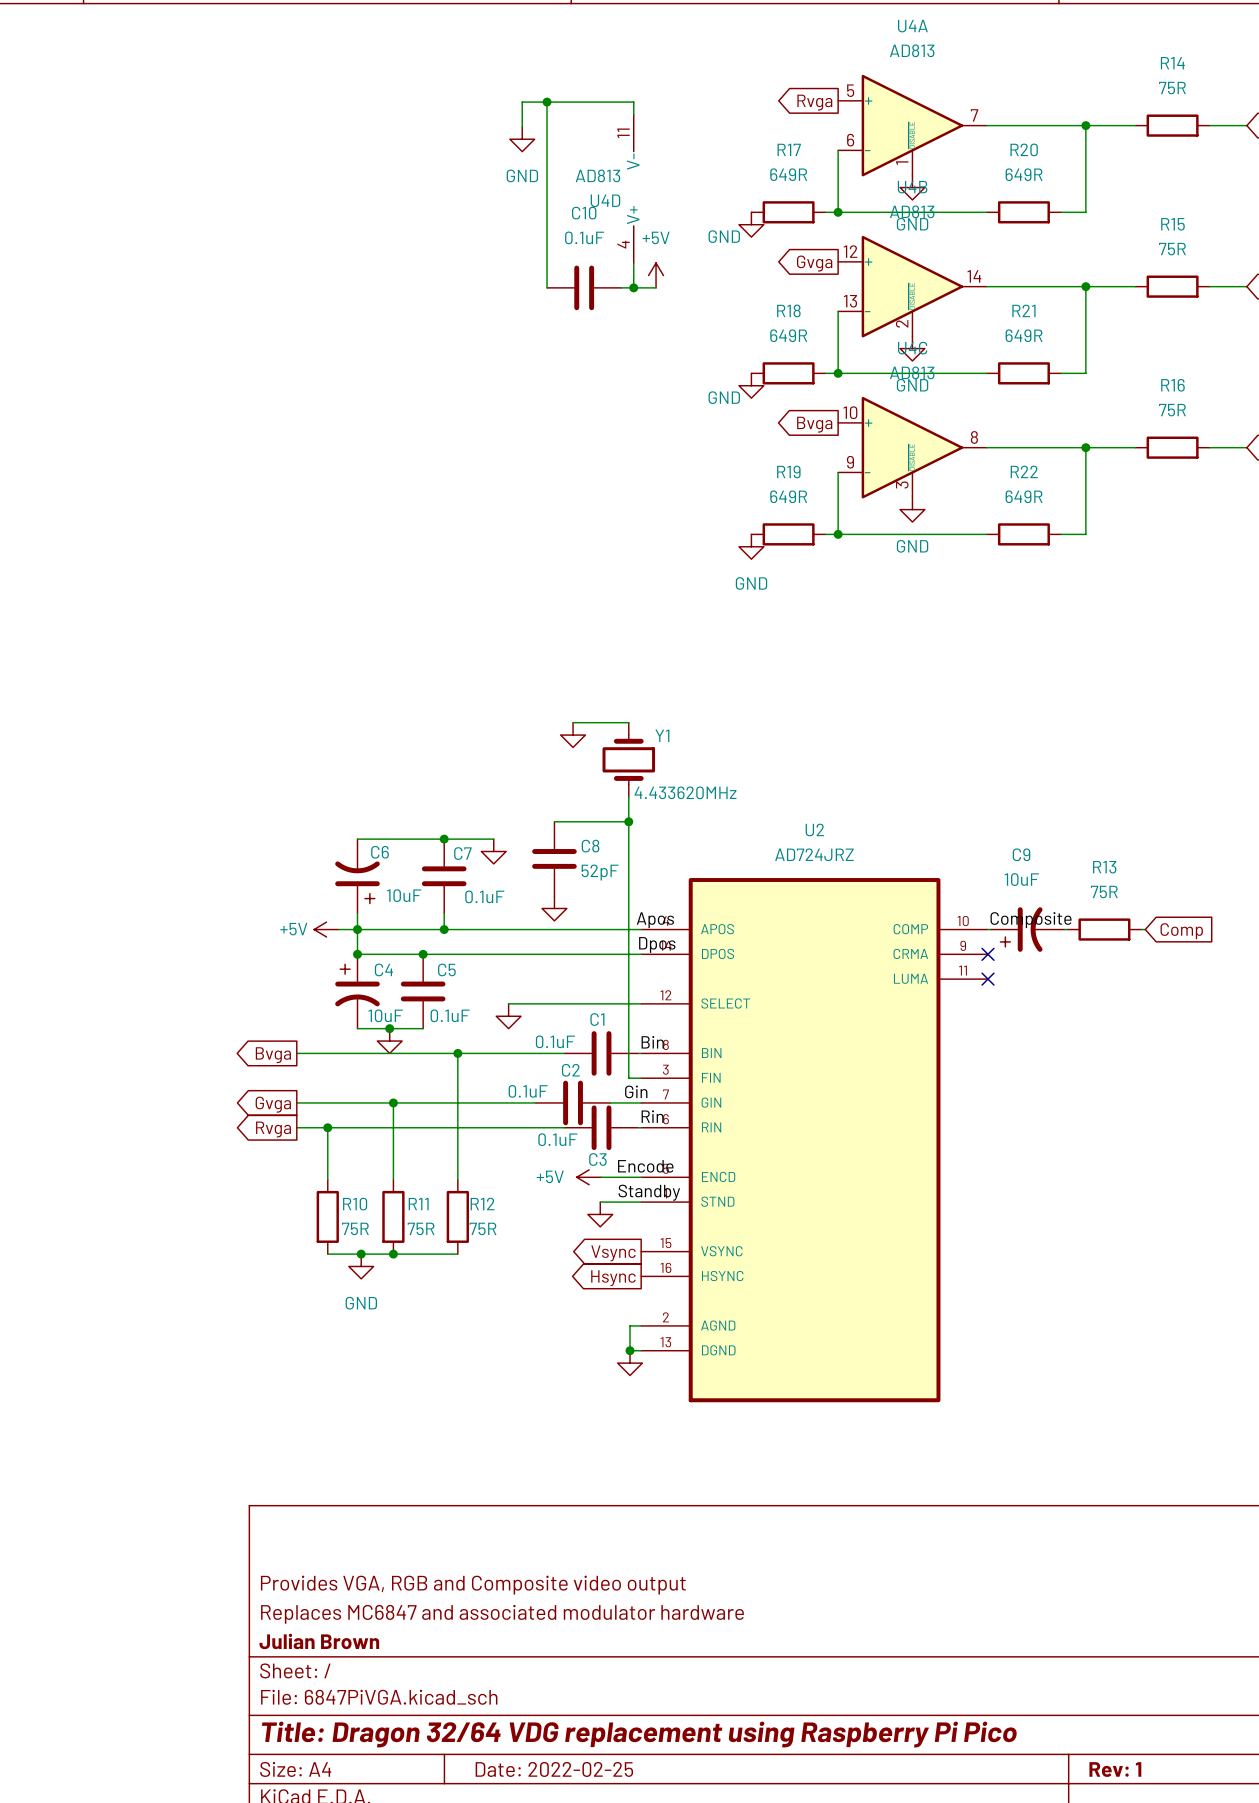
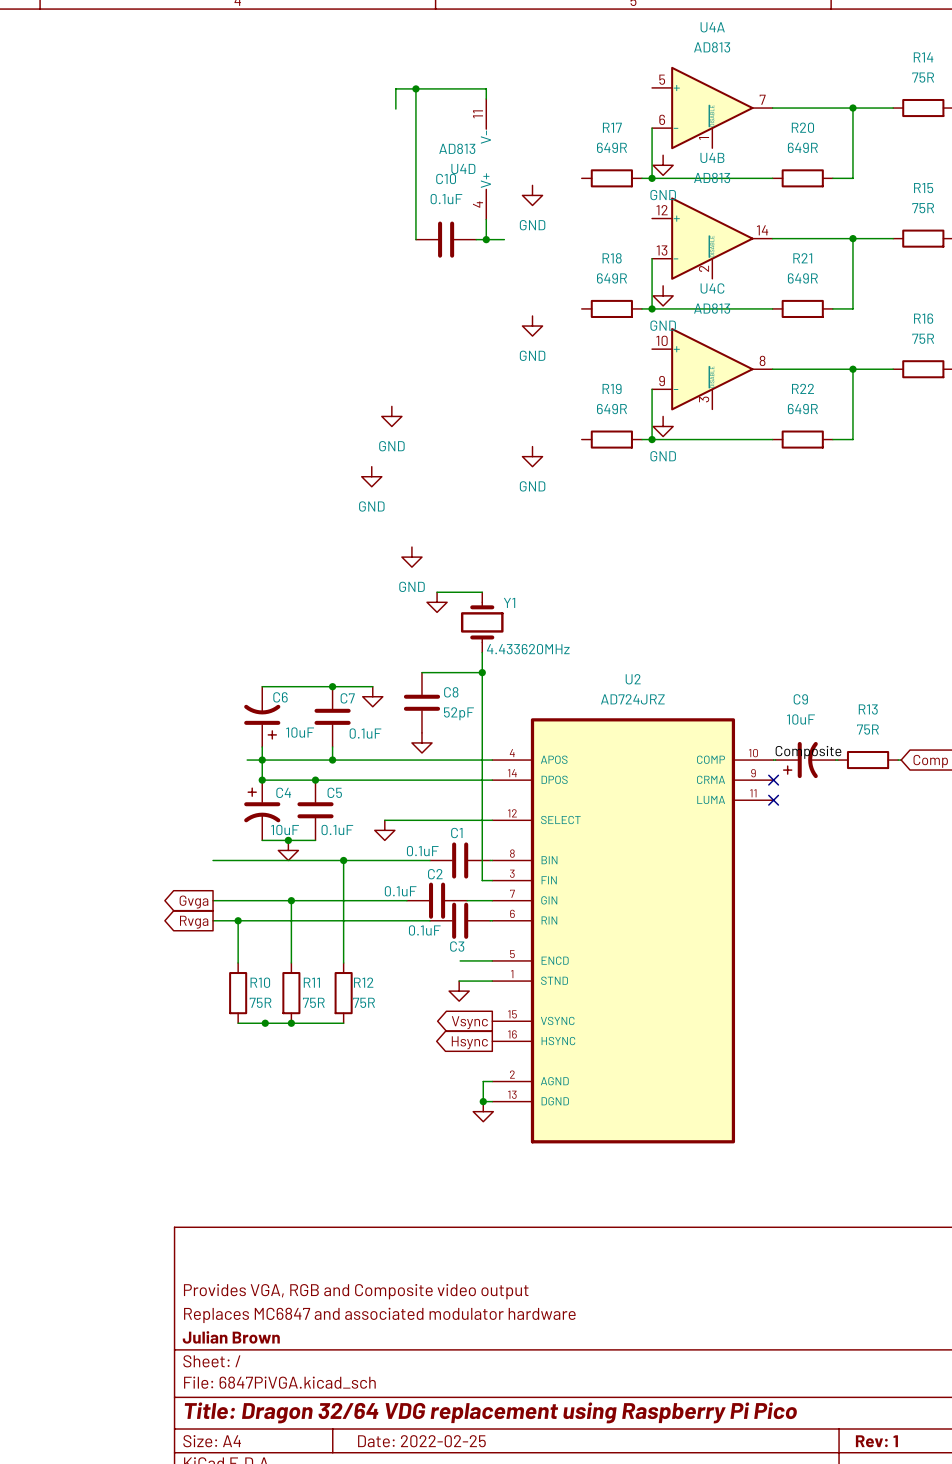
global label: Rvga (814, 102) -> none
power symbol: GND (522, 139) -> none
power symbol: GND (912, 187) -> none
power symbol: none -> GND (663, 165)
power symbol: GND (751, 224) -> none
power symbol: none -> GND (532, 195)
global label: Gvga (814, 263) -> none
power symbol: +5V (656, 275) -> none
power symbol: GND (912, 348) -> none
power symbol: none -> GND (663, 295)
power symbol: GND (751, 385) -> none
power symbol: none -> GND (532, 326)
global label: Bvga (814, 424) -> none
power symbol: none -> GND (391, 416)
power symbol: GND (912, 509) -> none
power symbol: none -> GND (663, 426)
power symbol: GND (751, 546) -> none
power symbol: none -> GND (532, 456)
power symbol: none -> GND (371, 476)
power symbol: none -> GND (411, 557)
label: Apos (655, 920) -> none
power symbol: +5V (326, 929) -> none
label: Dpos (657, 944) -> none
label: Bin (652, 1042) -> none
global label: Bvga (273, 1055) -> none
label: Gin (636, 1091) -> none
label: Rin (652, 1116) -> none
label: Encode (645, 1166) -> none
power symbol: +5V (589, 1177) -> none
label: Standby (649, 1192) -> none
power symbol: GND (361, 1266) -> none

